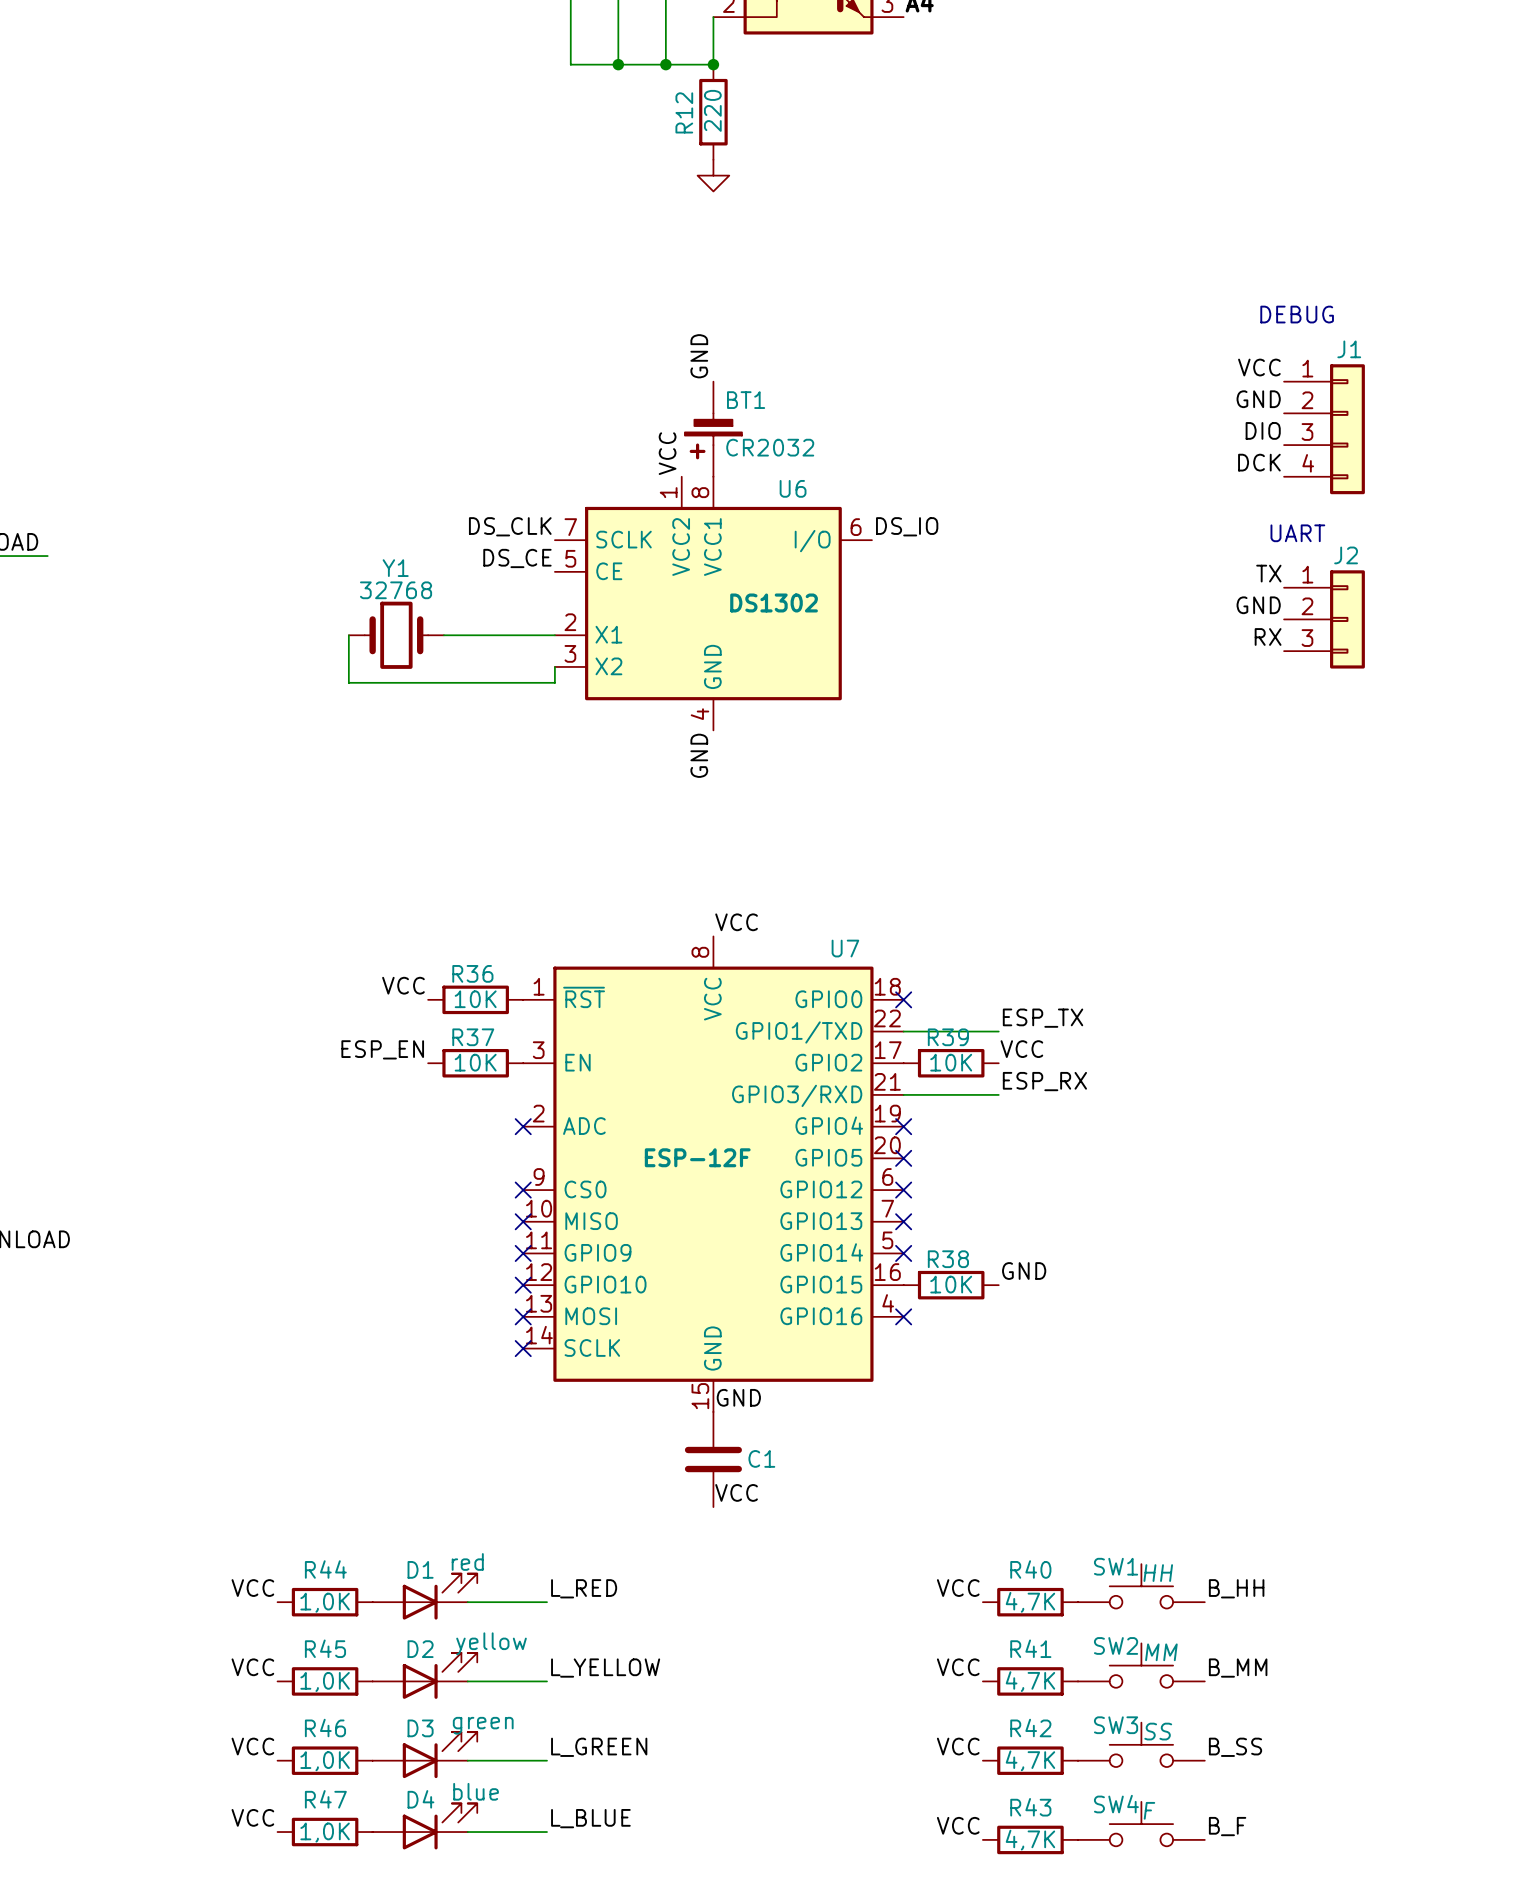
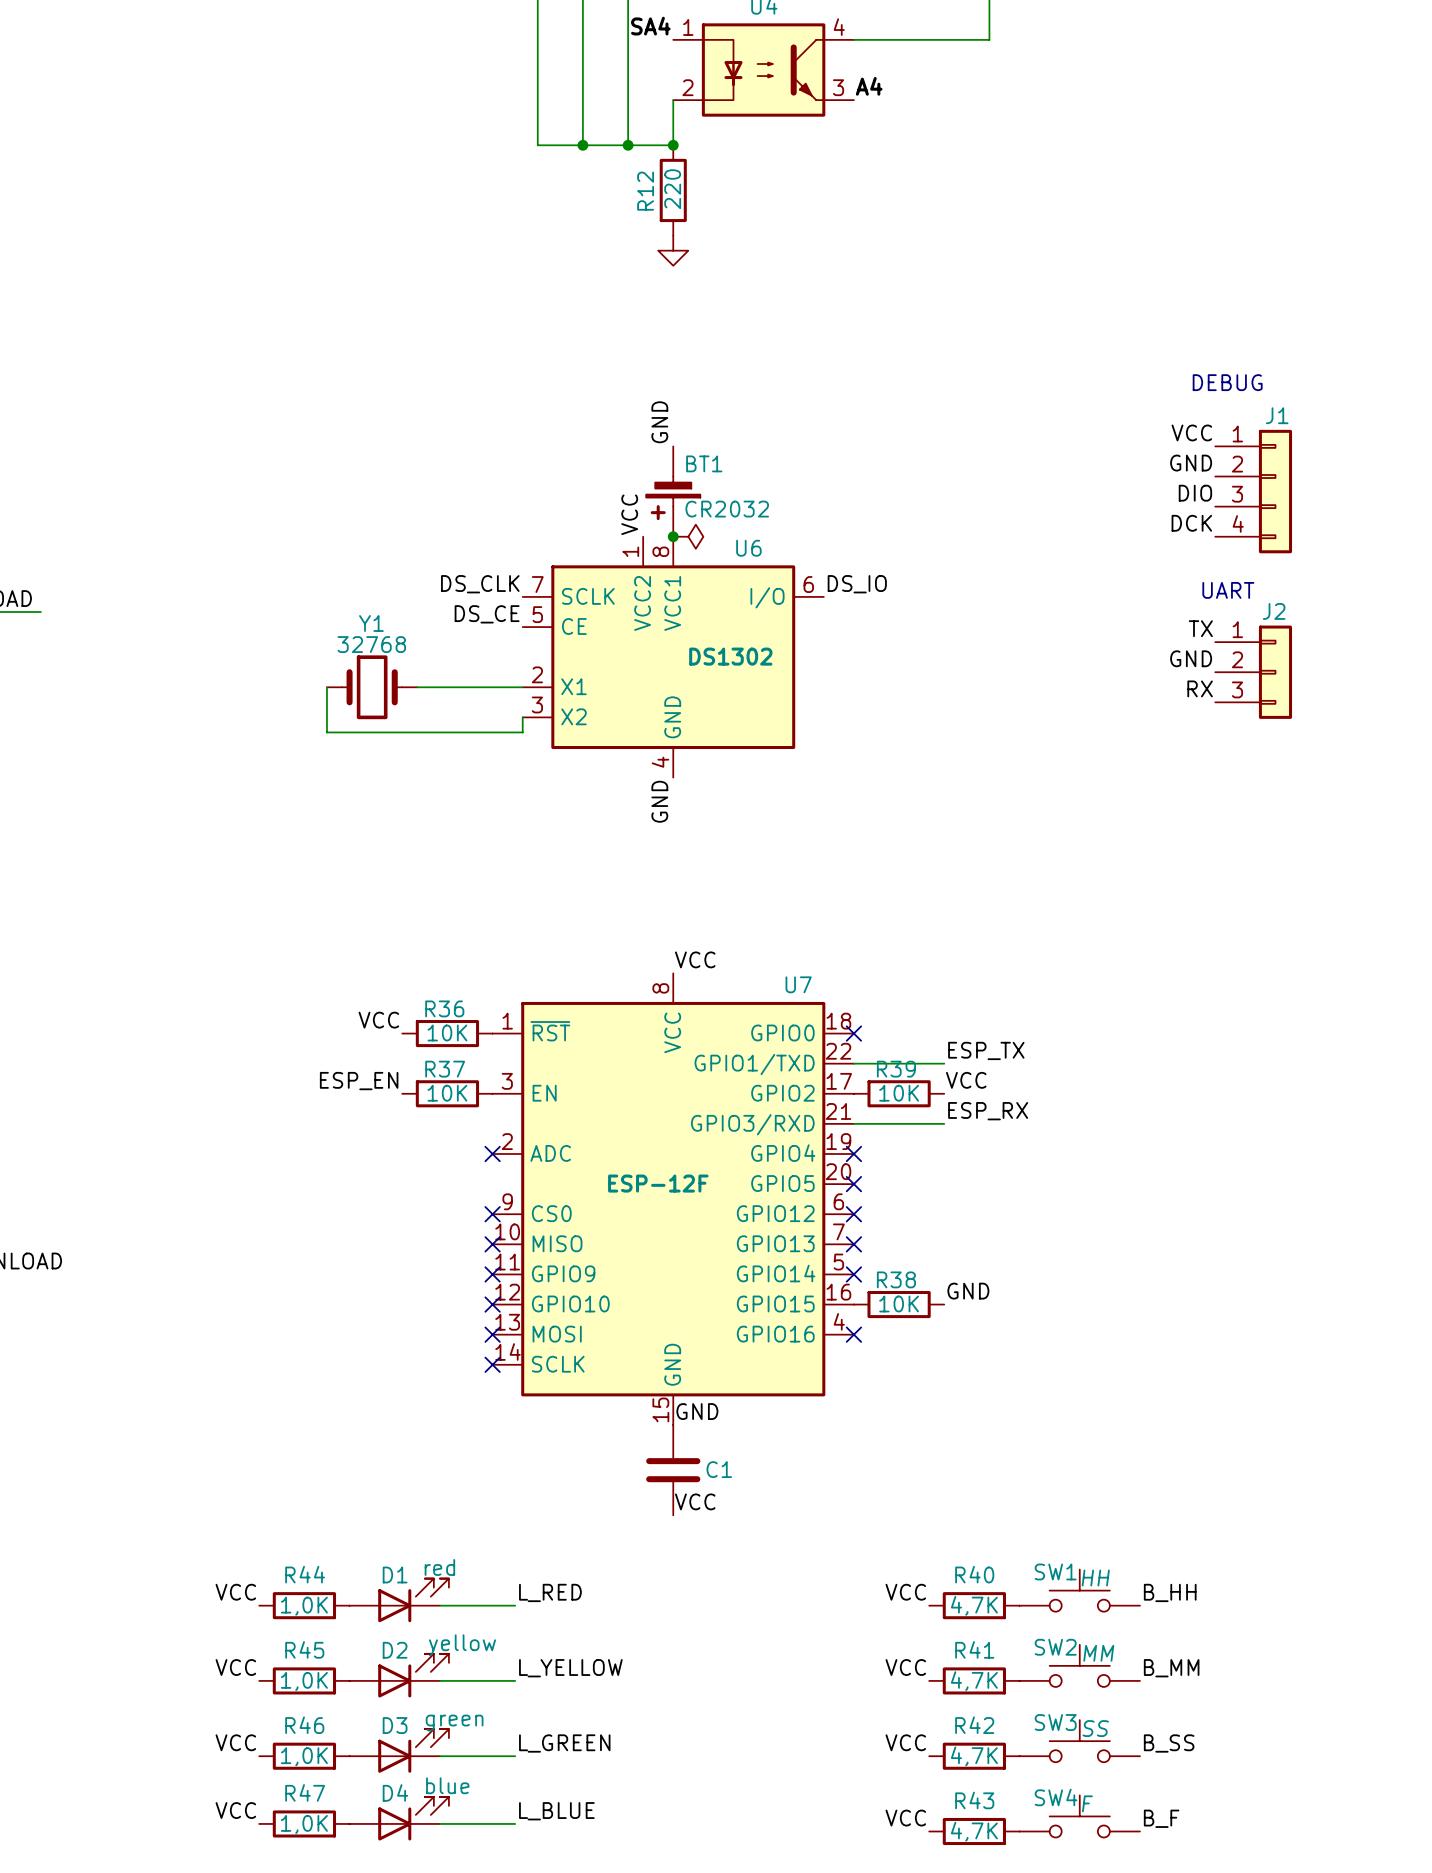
junction: none -> (673, 536)
power symbol: none -> (688, 536)

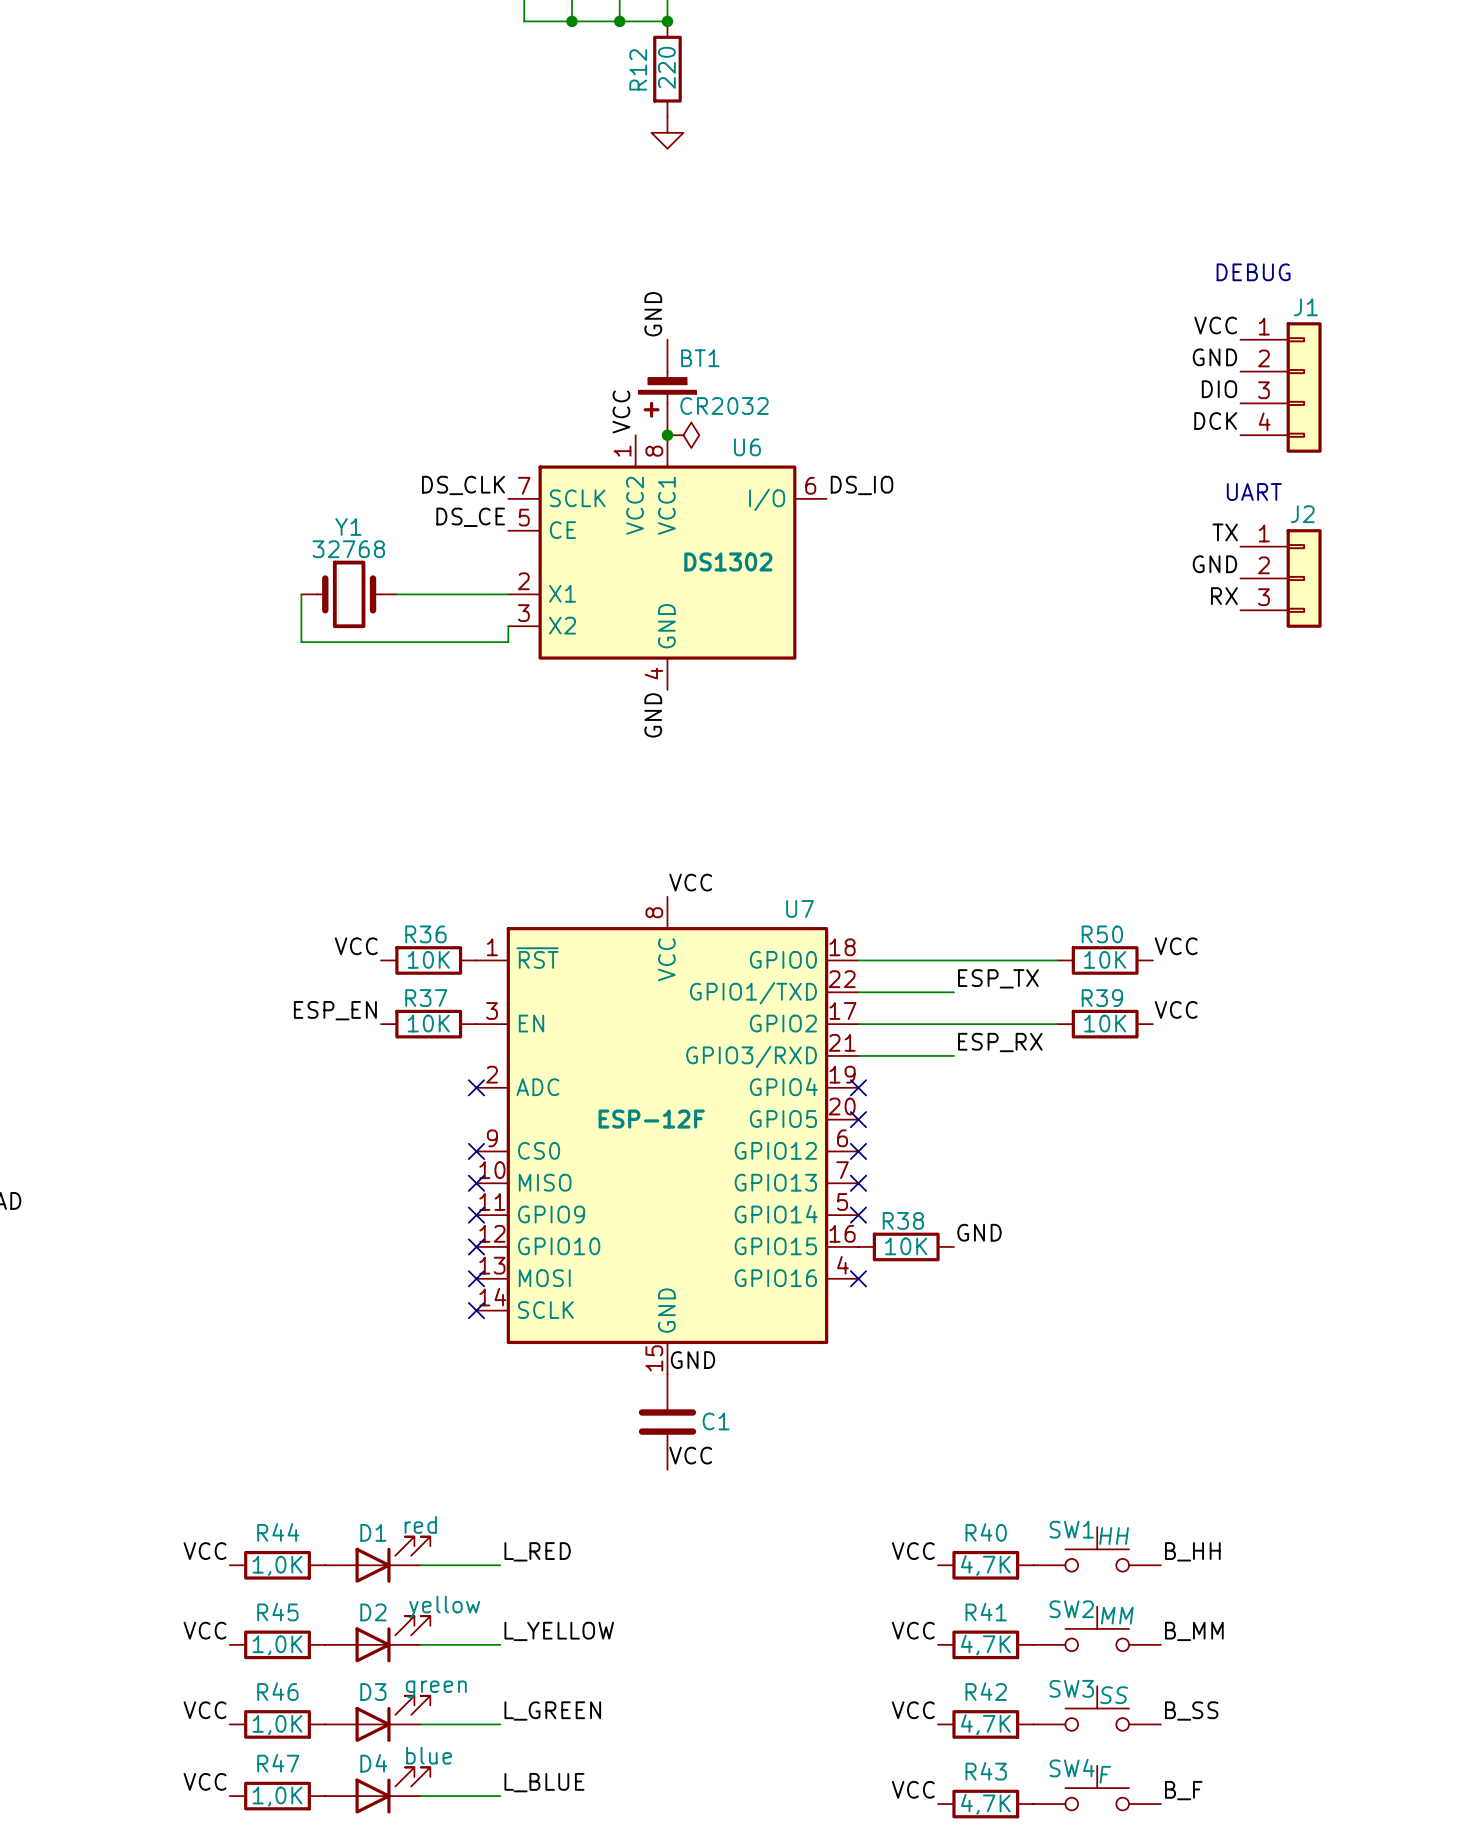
label: none -> VCC (1176, 946)
wire: none -> (858, 960) (1057, 960)
no-connect mark: (853, 1033) -> none
R50: none -> 10K (1105, 960)
label: VCC (966, 1080) -> none
label: none -> VCC (1176, 1009)
wire: none -> (858, 1024) (1057, 1024)
R39 position: (899, 1093) -> (1105, 1024)

